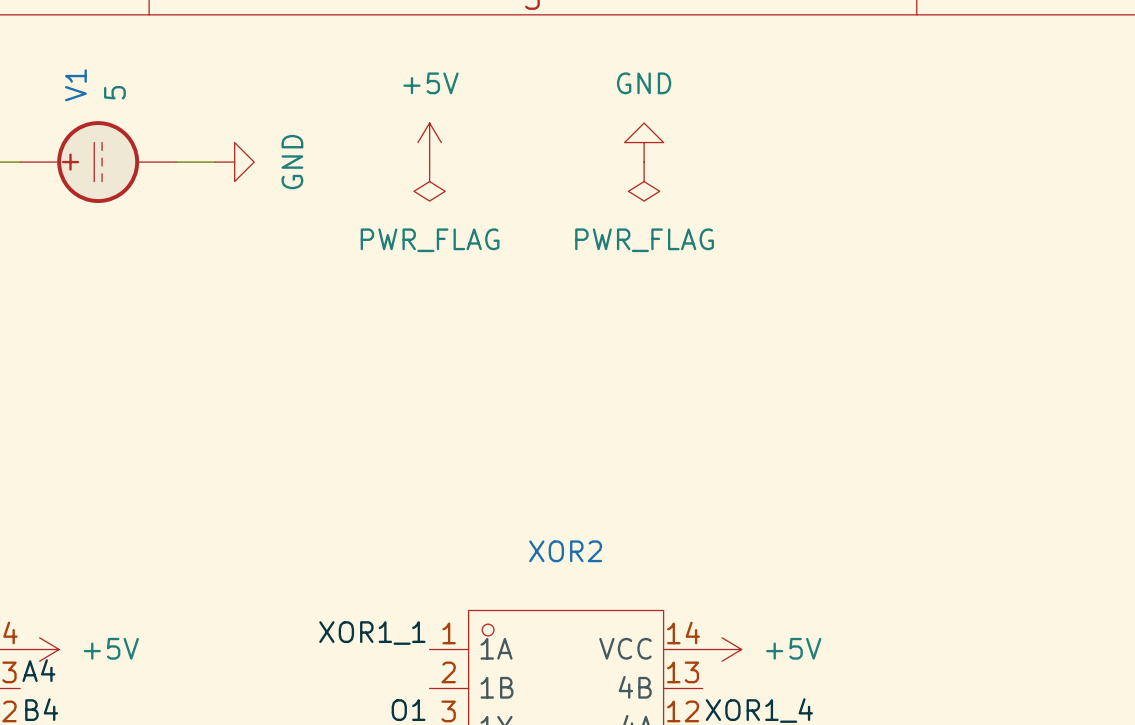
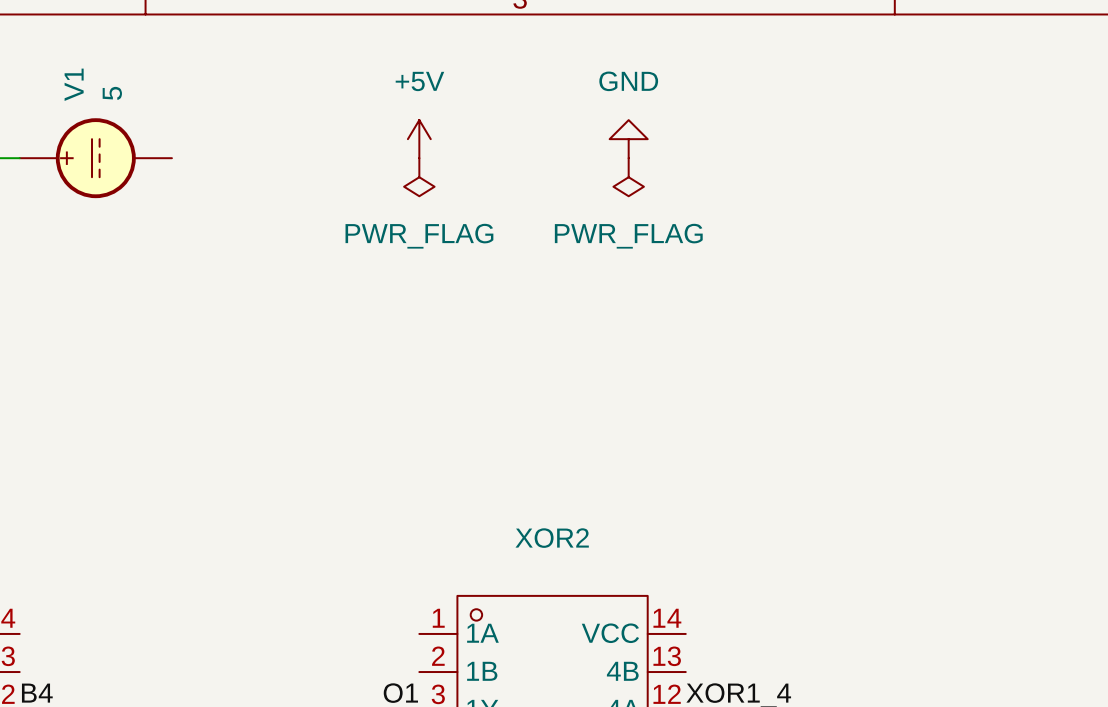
wire: (176, 162) (215, 162) -> none
power symbol: GND (234, 162) -> none
label: XOR1_1 (372, 633) -> none
power symbol: +5V (39, 649) -> none
power symbol: +5V (722, 649) -> none
label: A4 (38, 670) -> none

